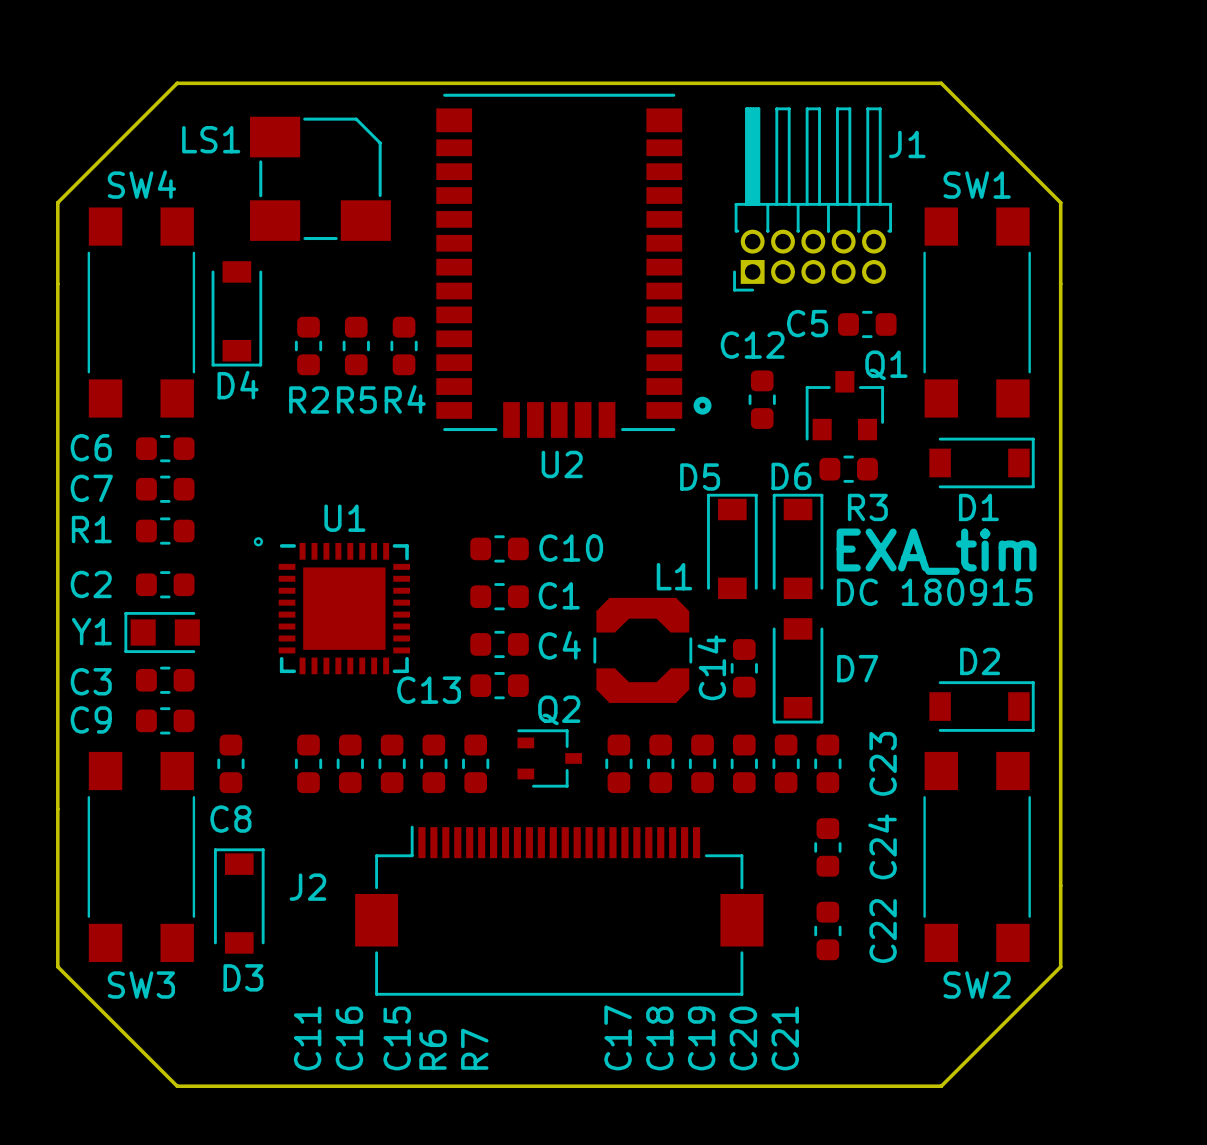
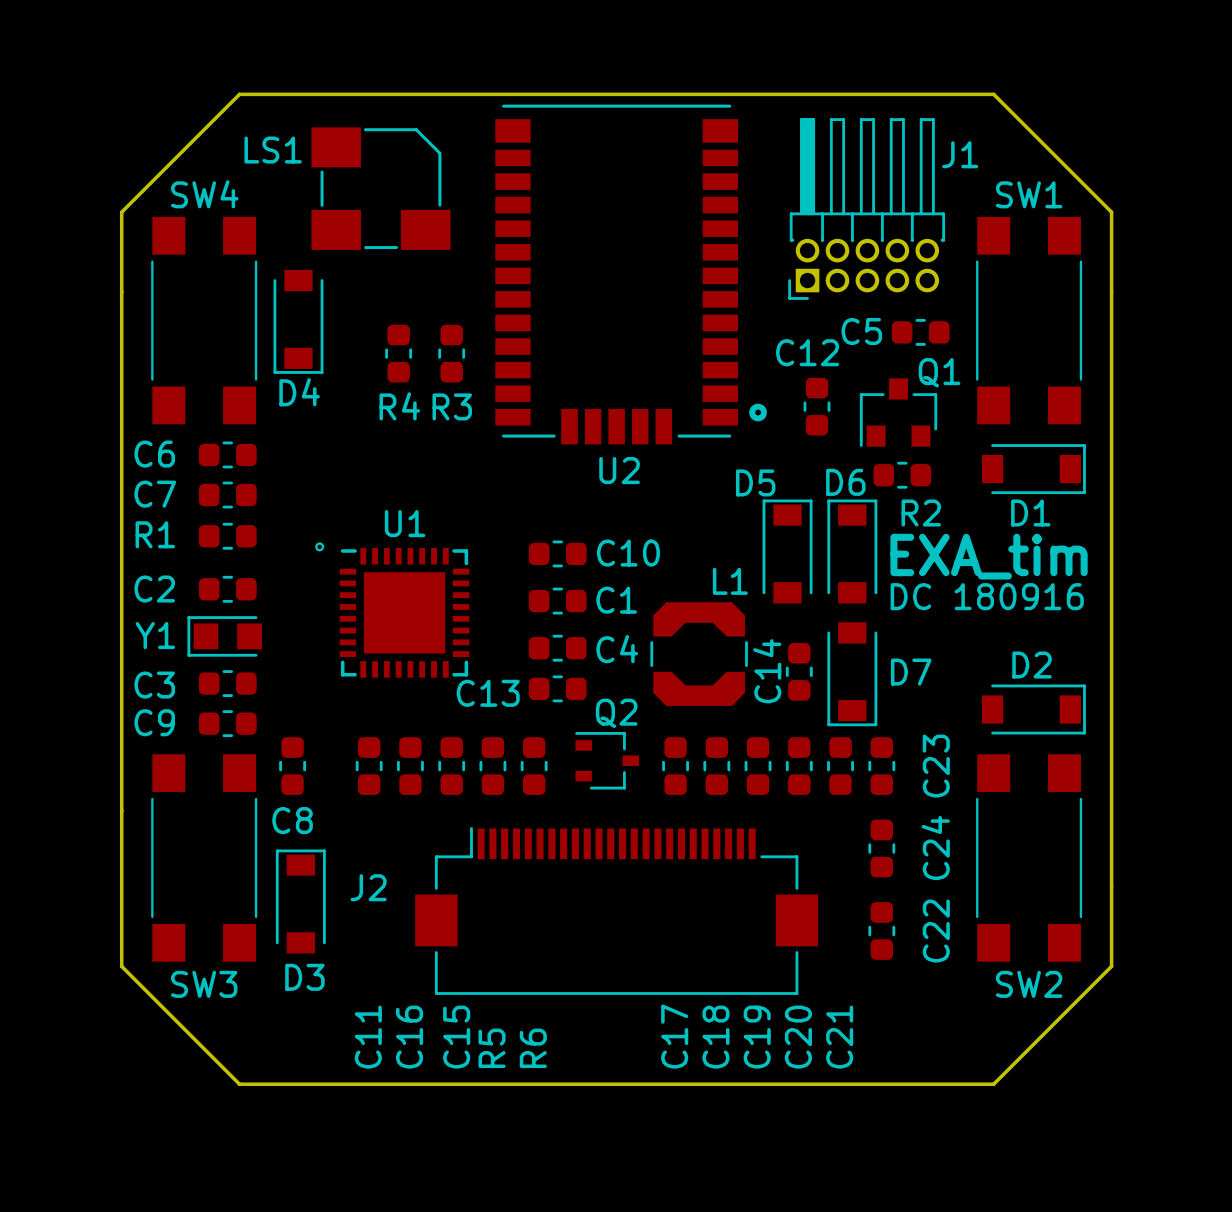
R2: (308, 345) -> none
R5: (356, 345) -> none
R3: none -> (451, 353)
R4 position: (404, 345) -> (398, 353)
R3 name: R3 (867, 507) -> R2 (921, 512)
text: DC 180915 (934, 592) -> DC 180916 (987, 596)
R6 name: R6 (433, 1049) -> R5 (492, 1048)
R7 name: R7 (474, 1049) -> R6 (533, 1048)

